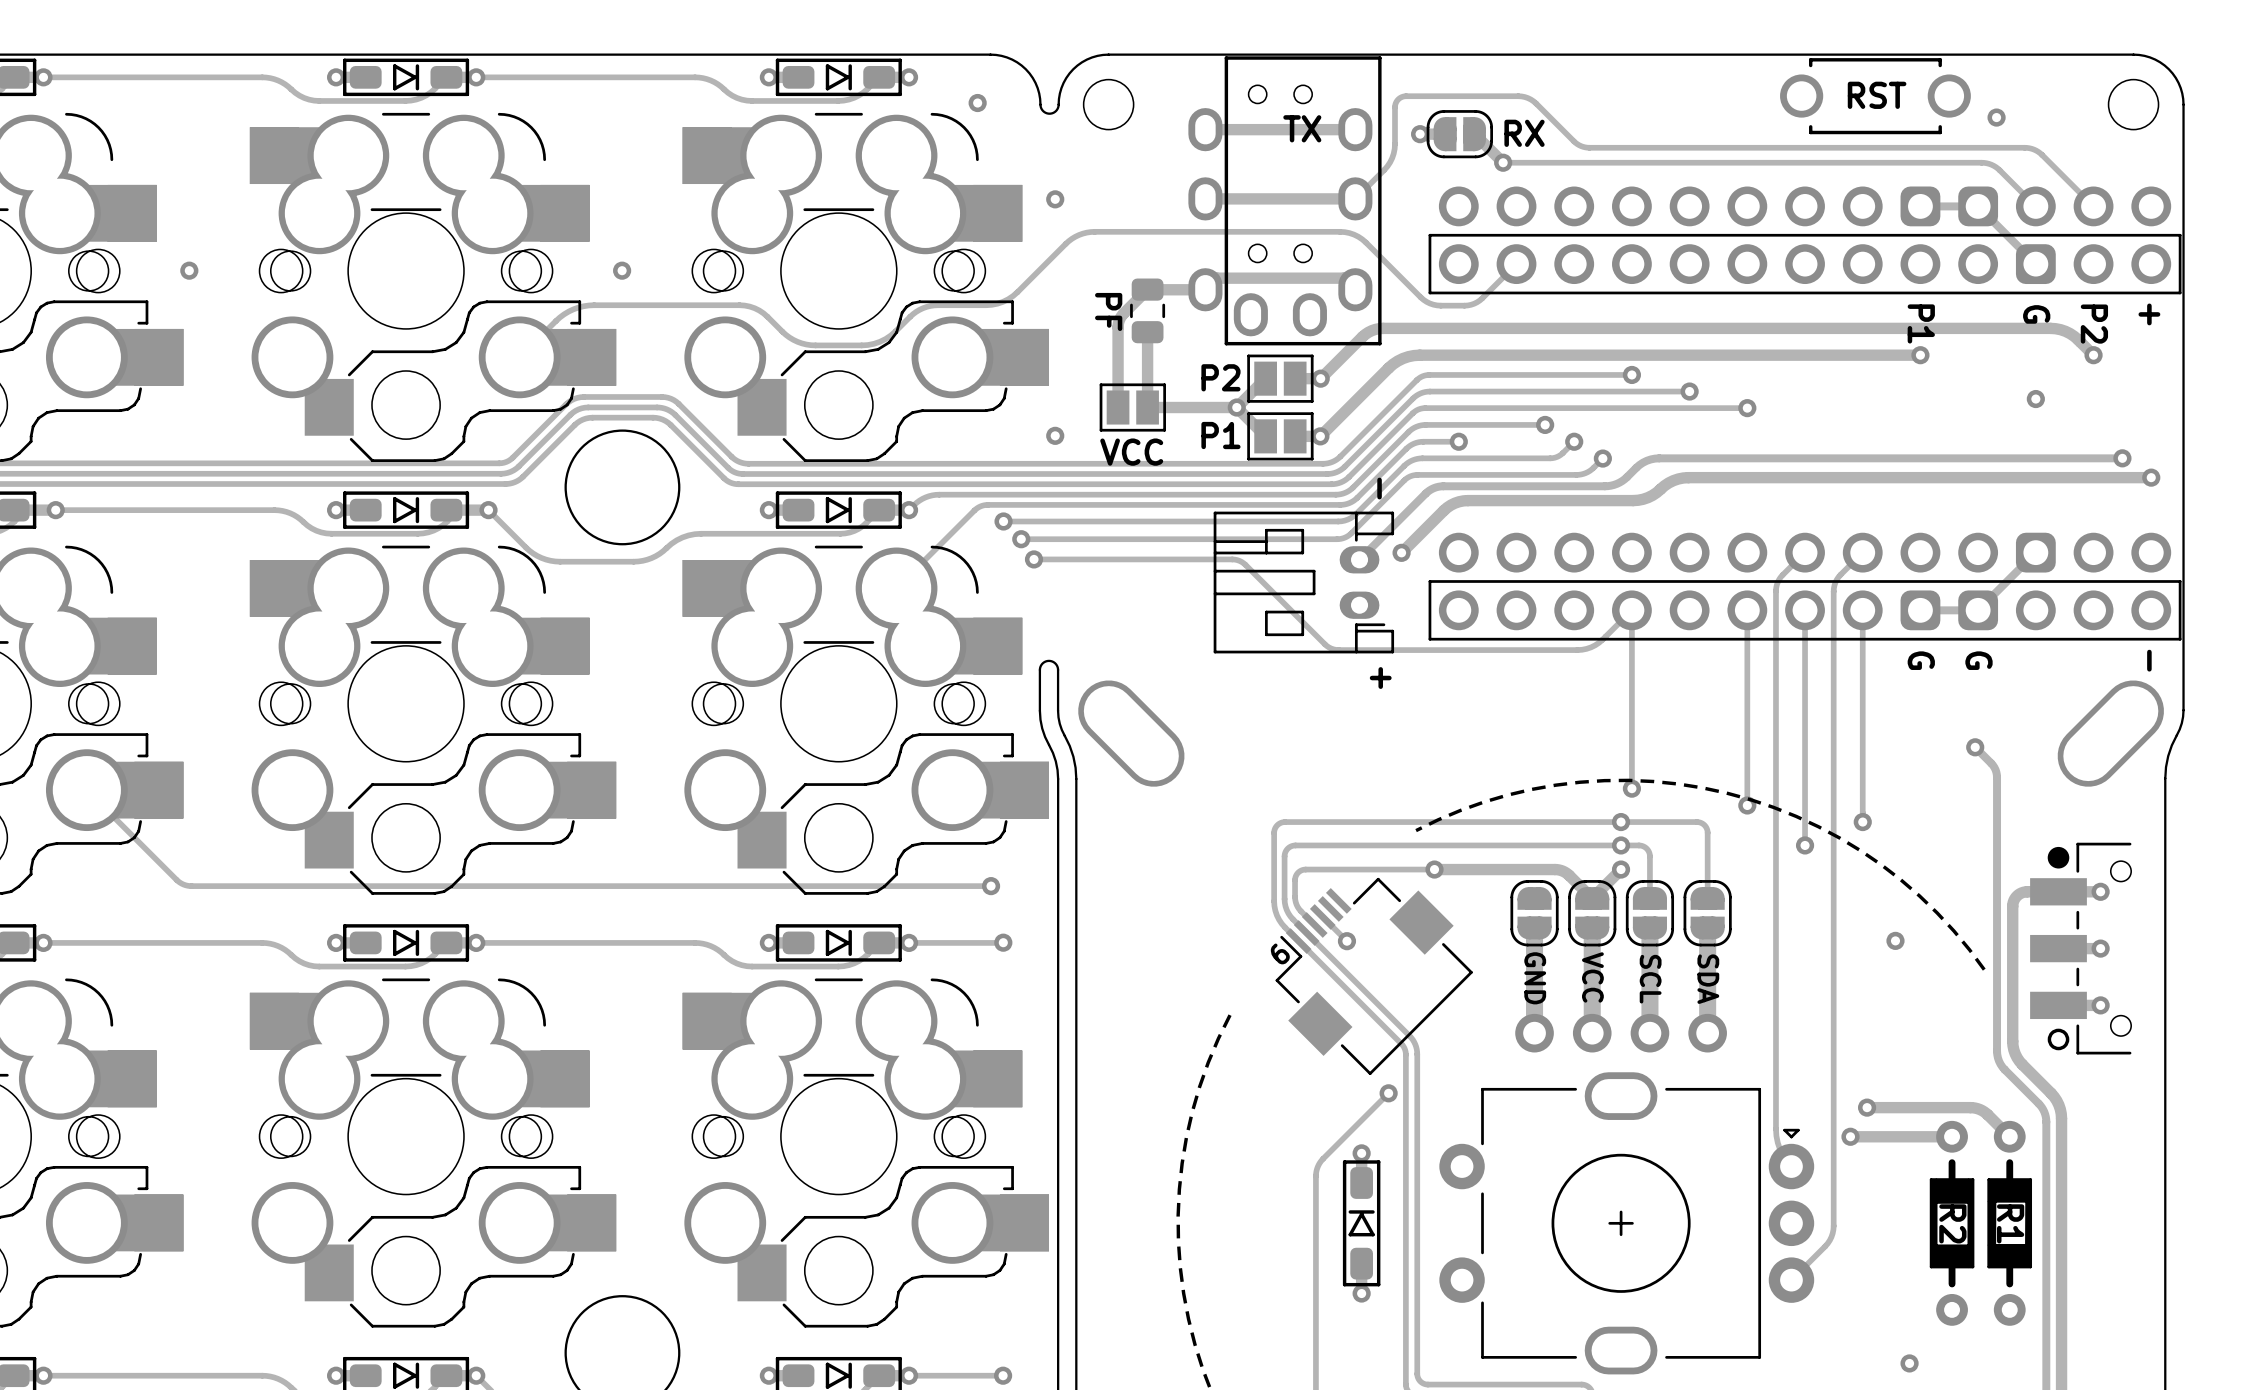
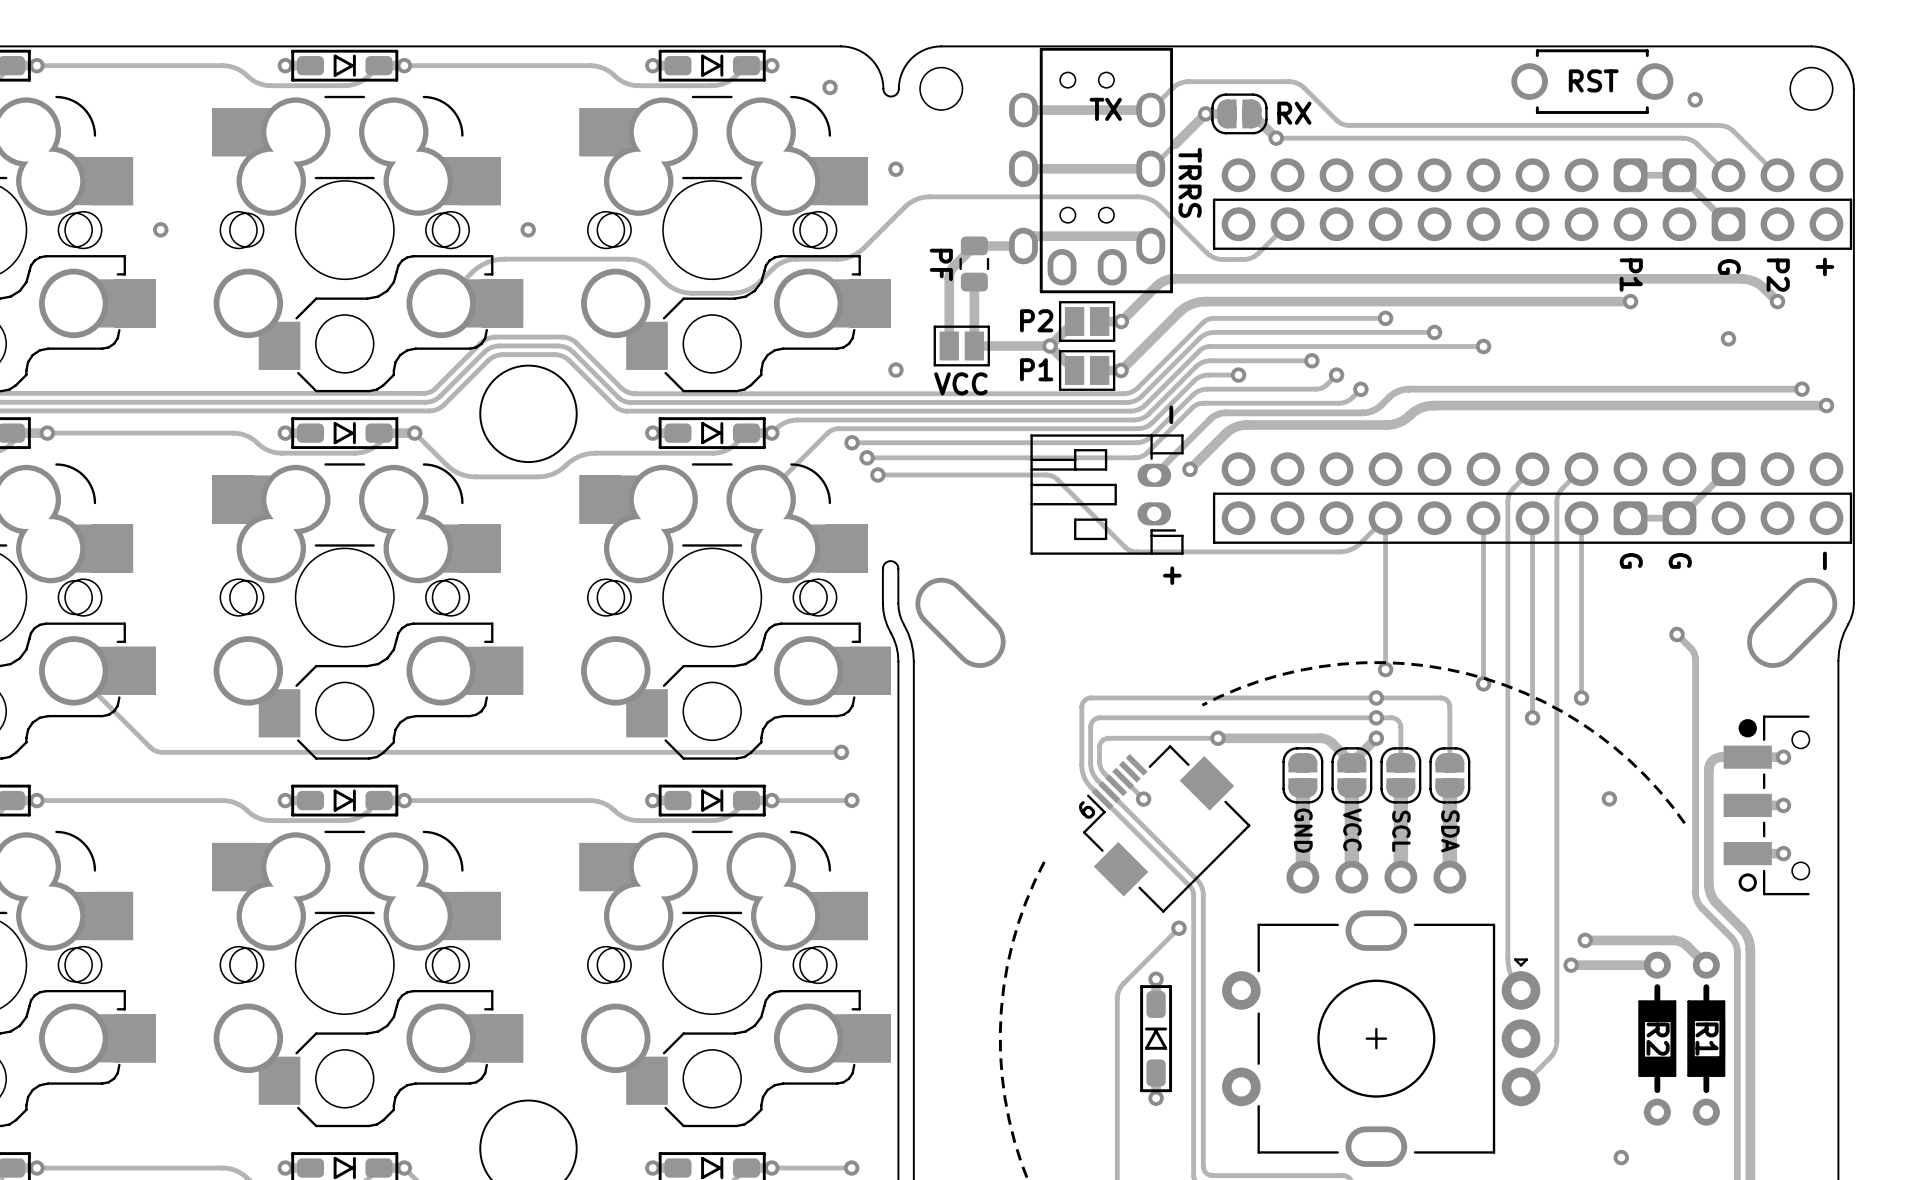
part footprint: [1188, 56, 1382, 346] -> [1008, 47, 1174, 294]
track: (1406, 96) (1399, 98) (1395, 104) (1394, 148) (1390, 162) (1384, 169) -> (1205, 113) (1175, 144)
track: none -> (1193, 81) (1177, 84) (1150, 110)

